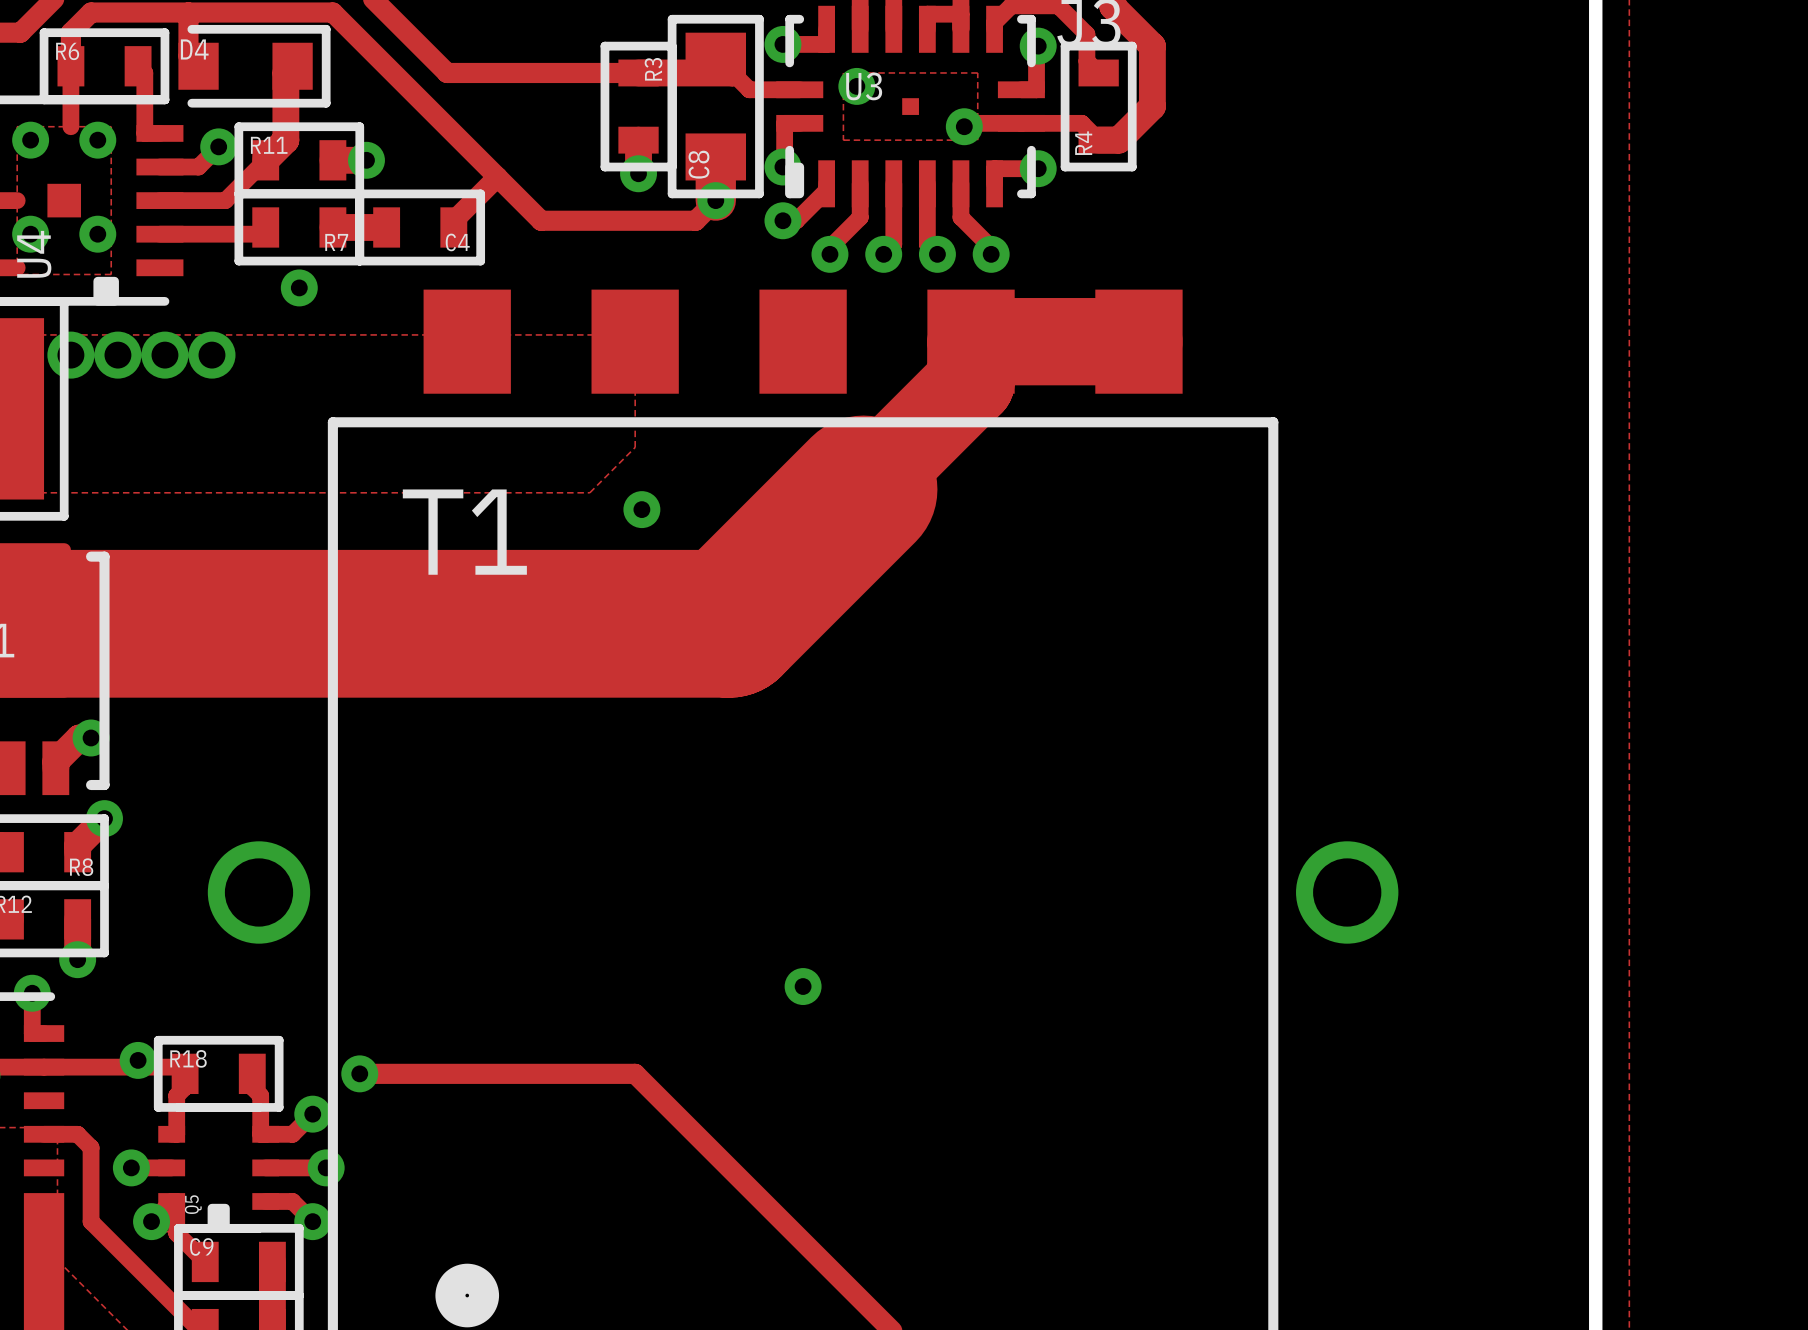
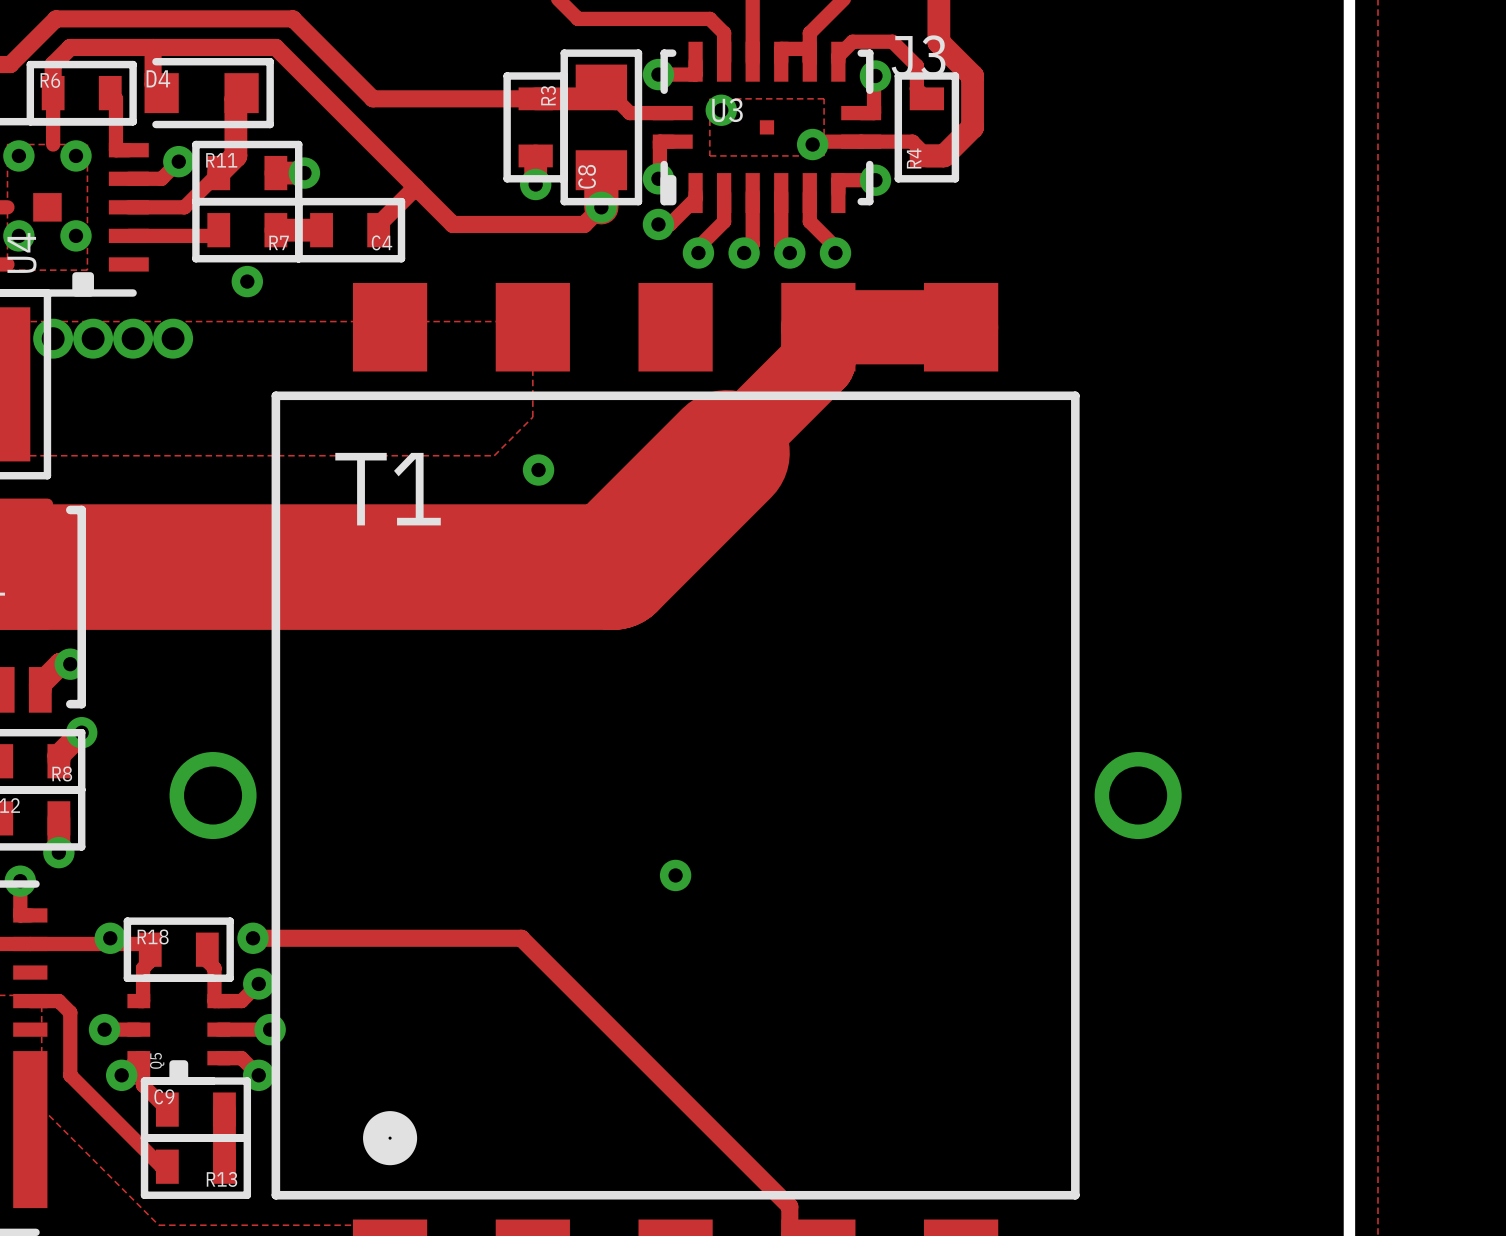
track: (359, 1073) (635, 1073) -> (253, 938) (521, 938) (532, 949)
via position: (359, 1073) -> (253, 938)

